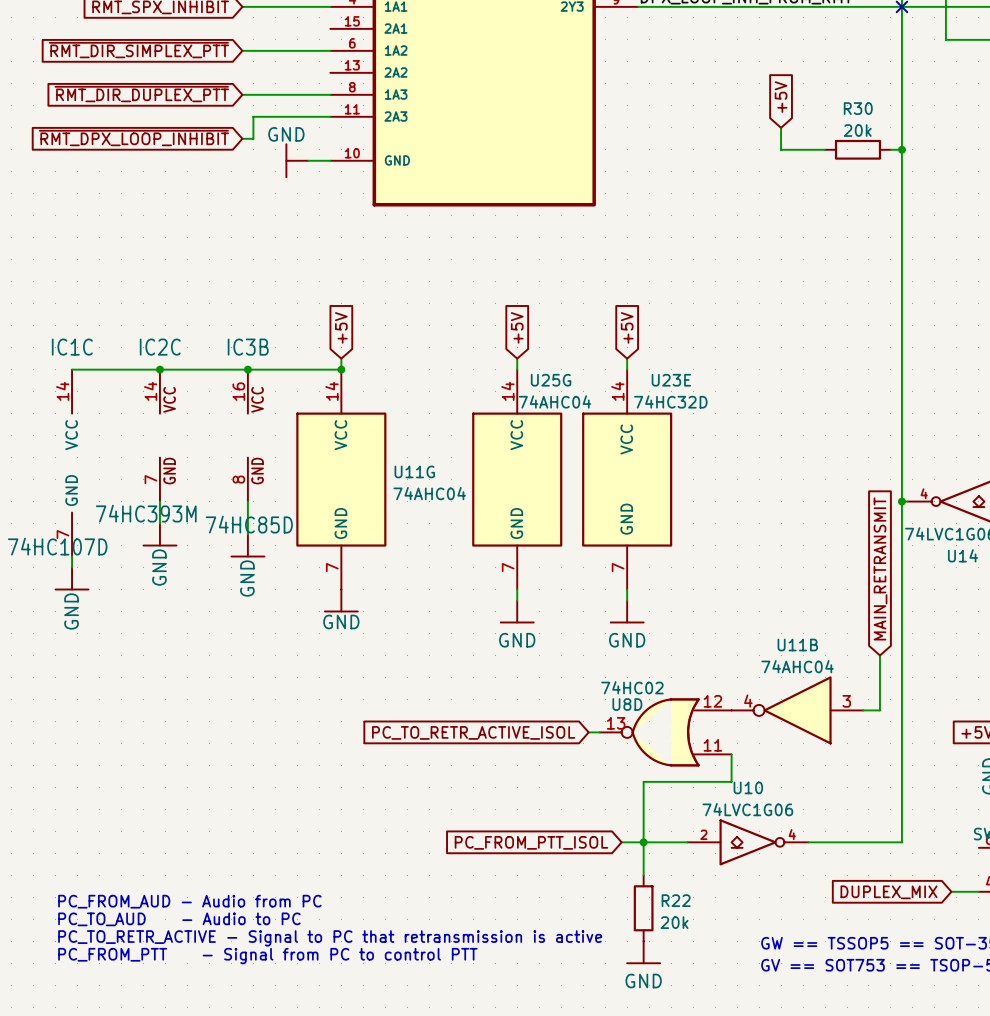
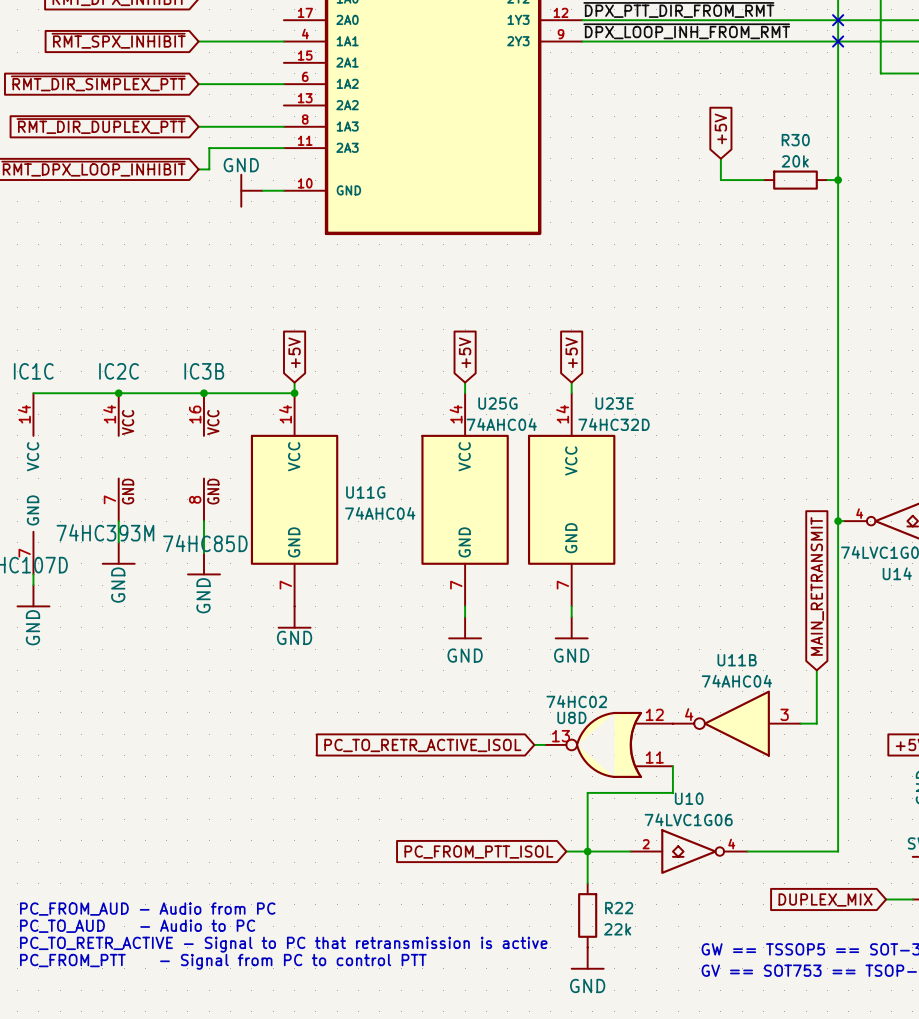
R22 value: 20k (674, 922) -> 22k (617, 929)

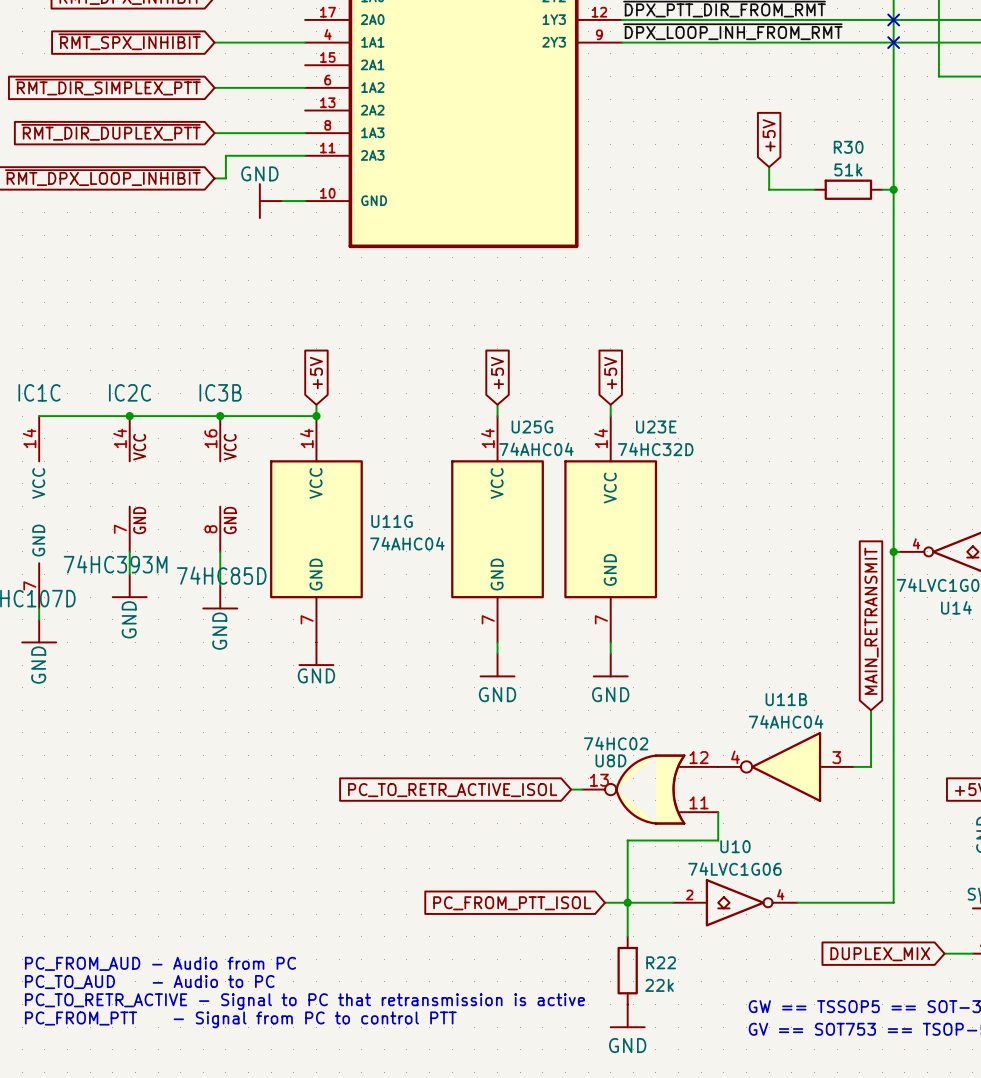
R30 value: 20k (795, 161) -> 51k (848, 169)

